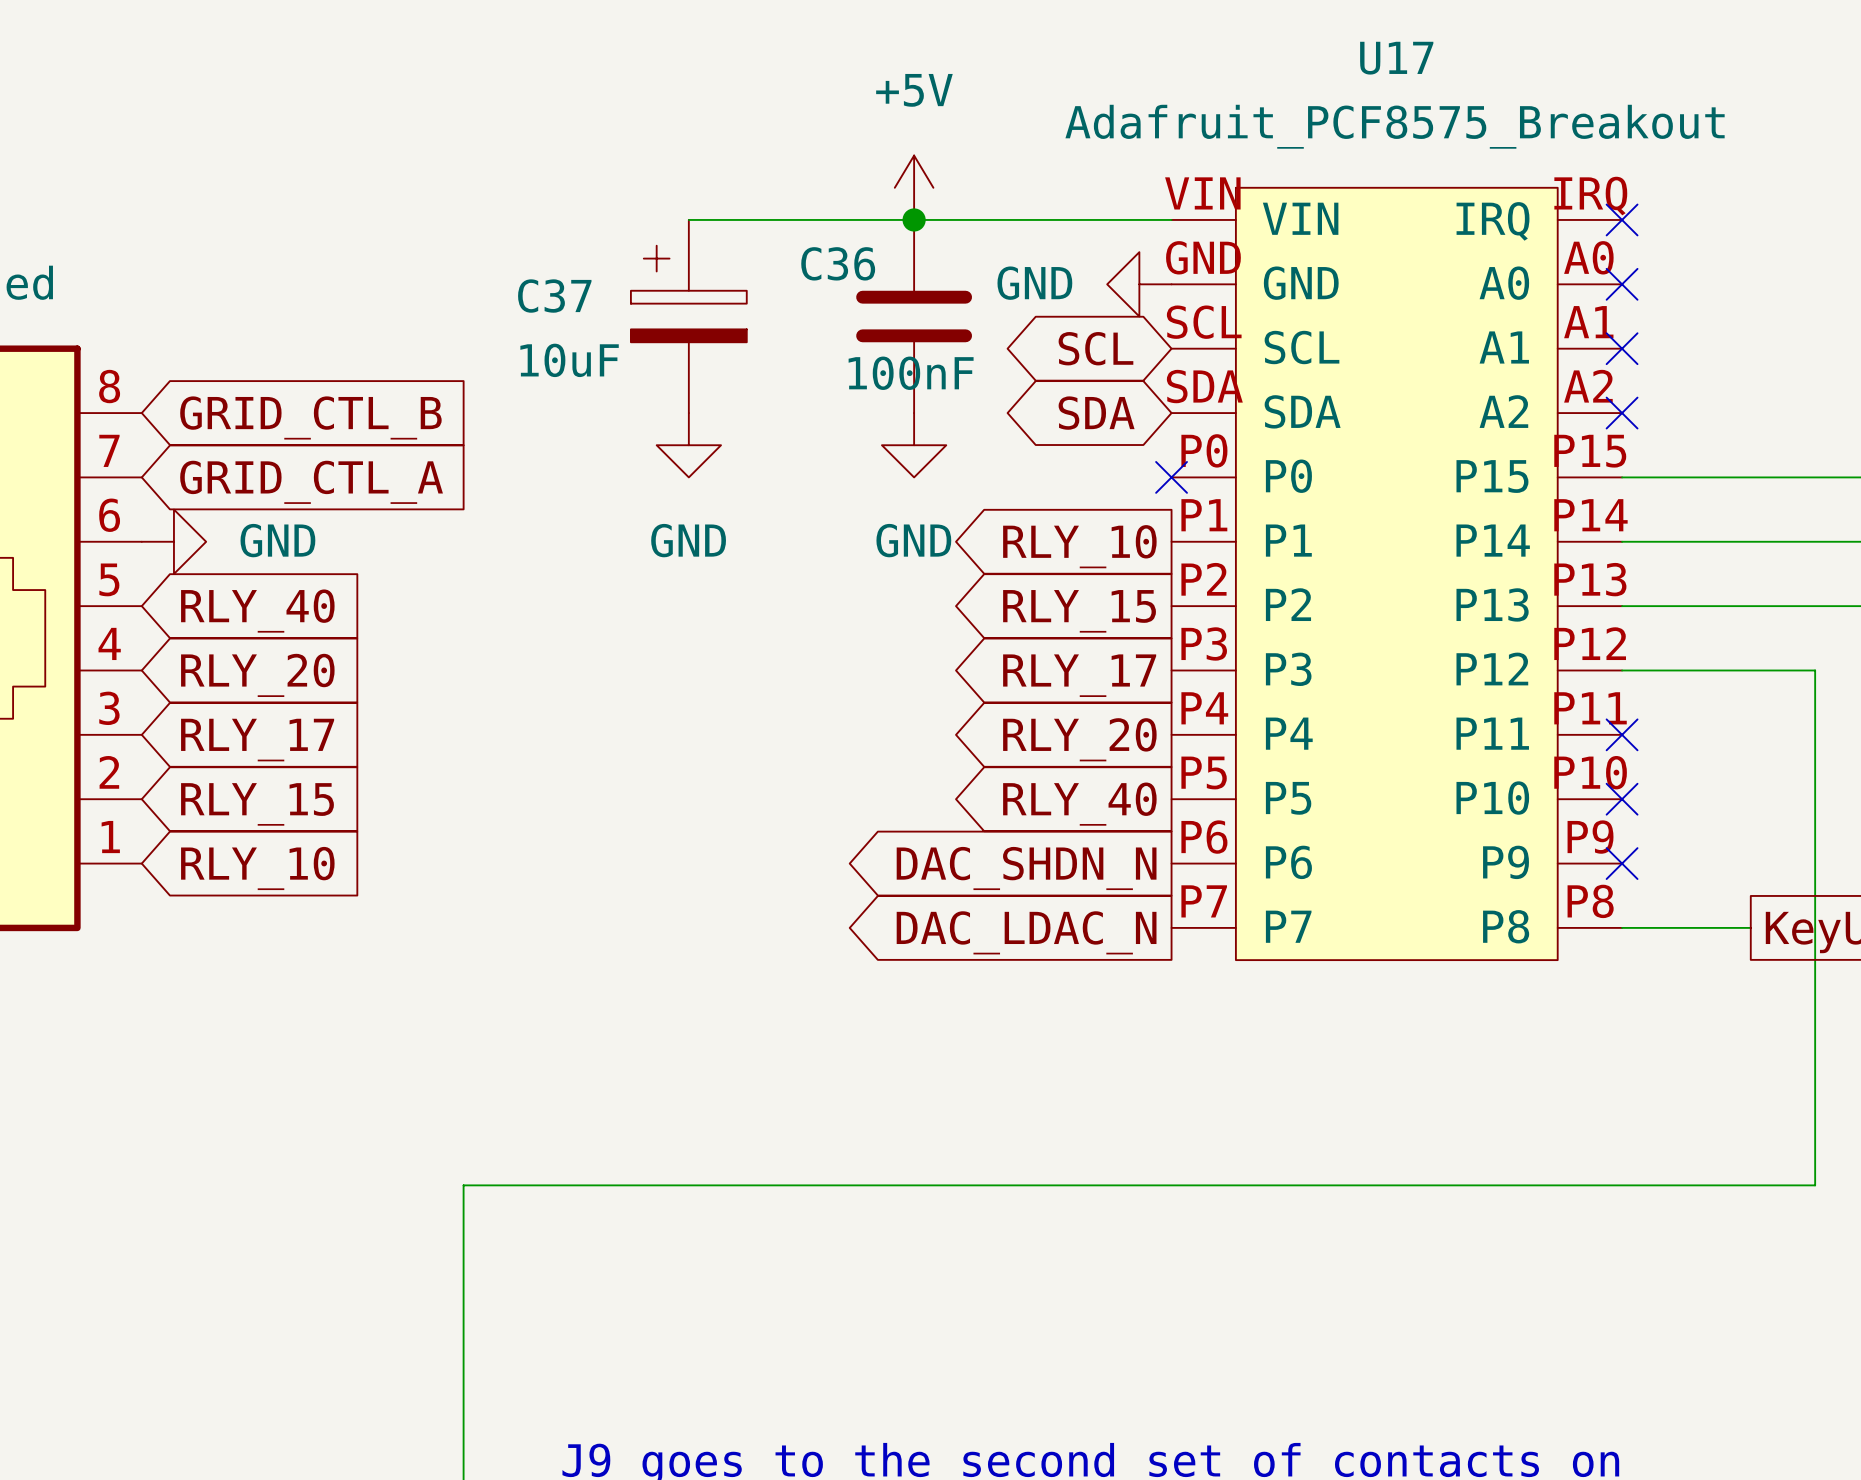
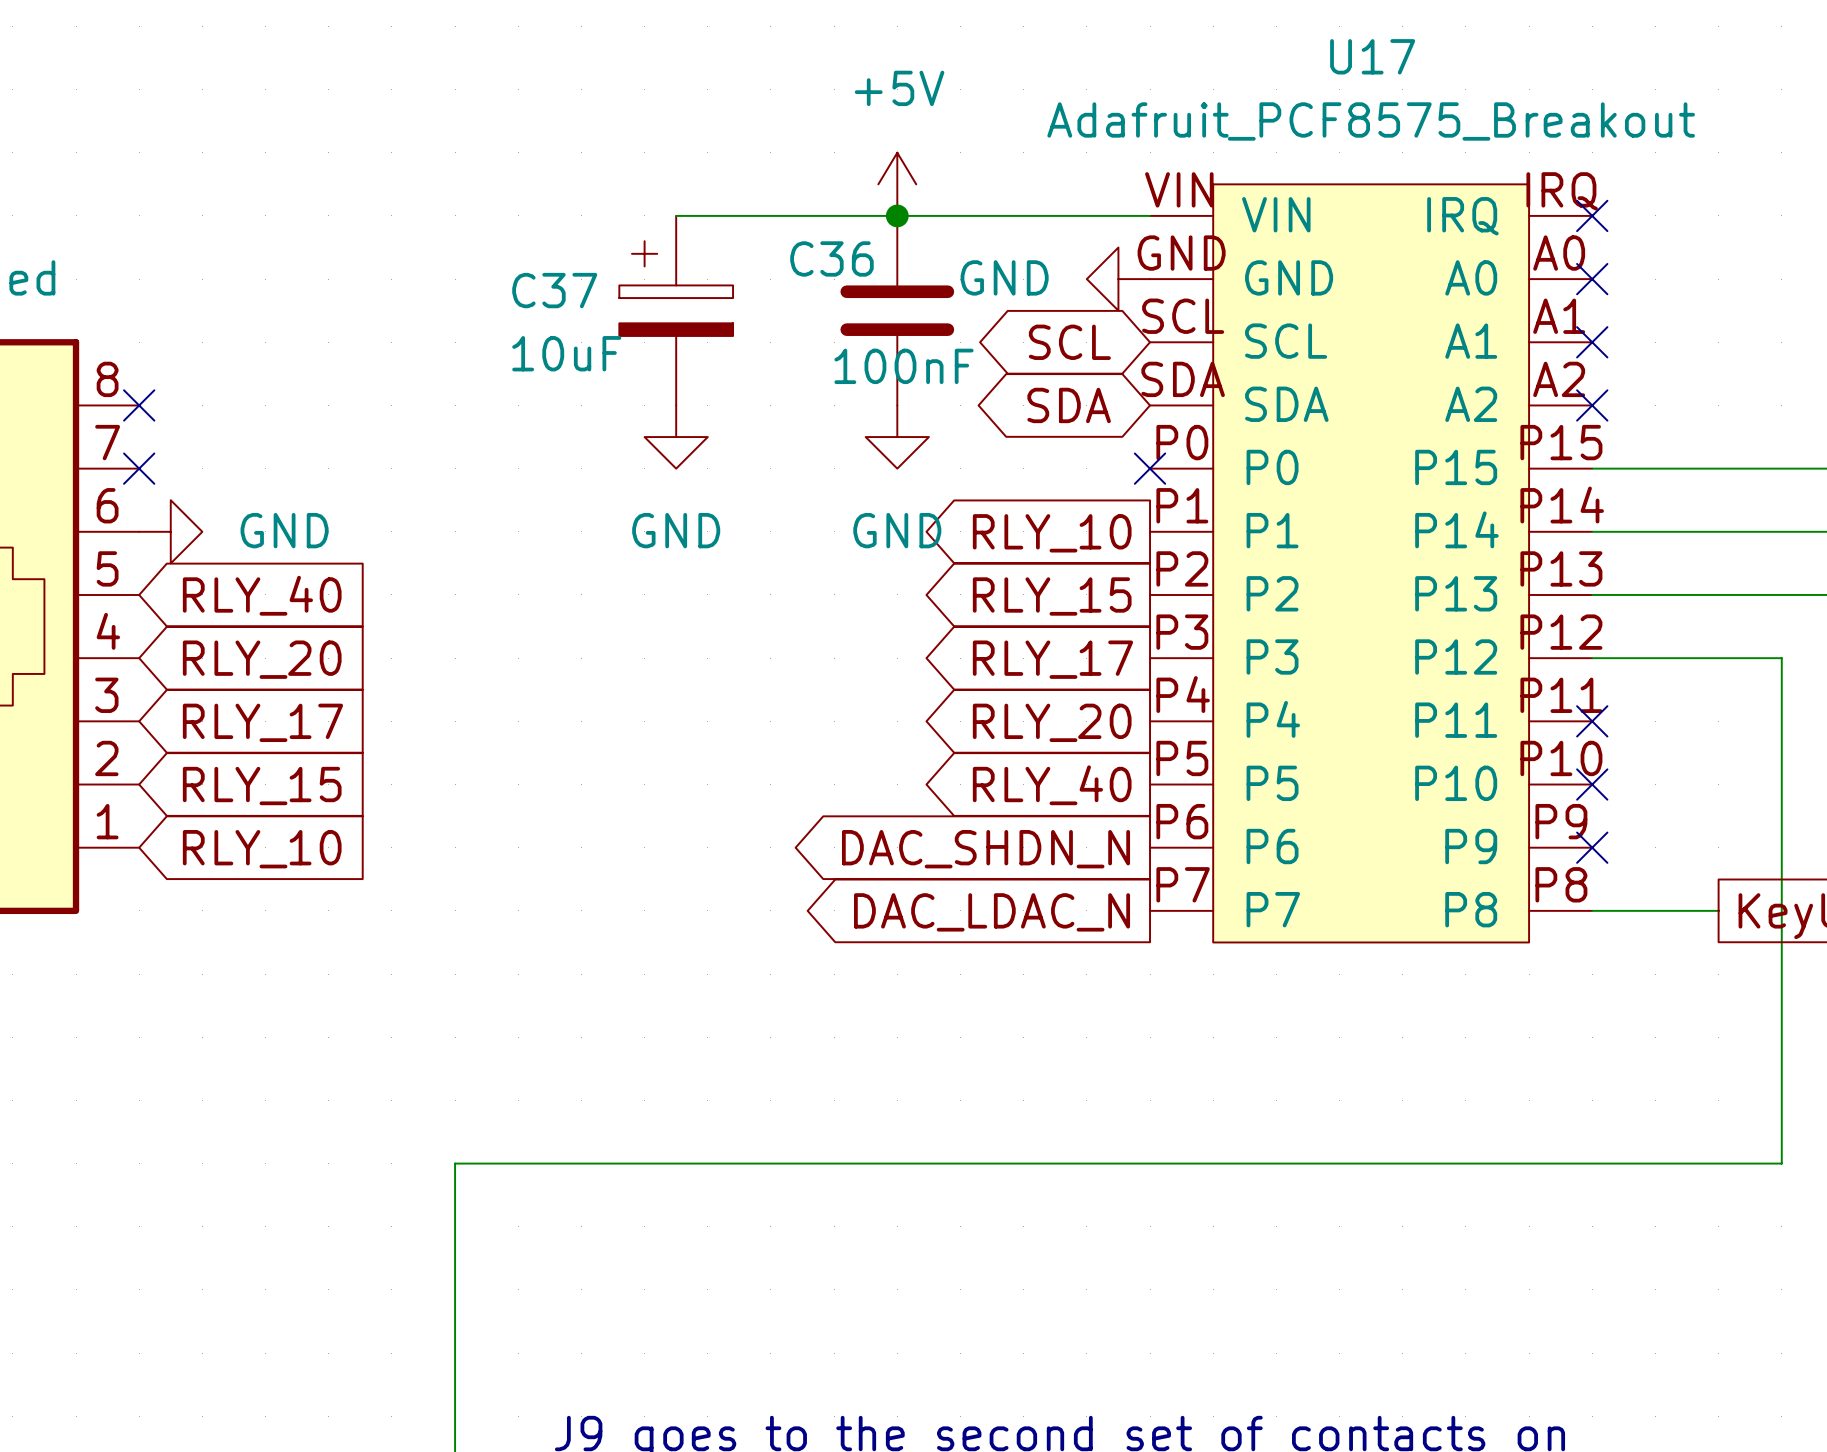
no-connect mark: none -> (139, 405)
global label: GRID_CTL_B (310, 417) -> none
no-connect mark: none -> (139, 468)
global label: GRID_CTL_A (311, 482) -> none

